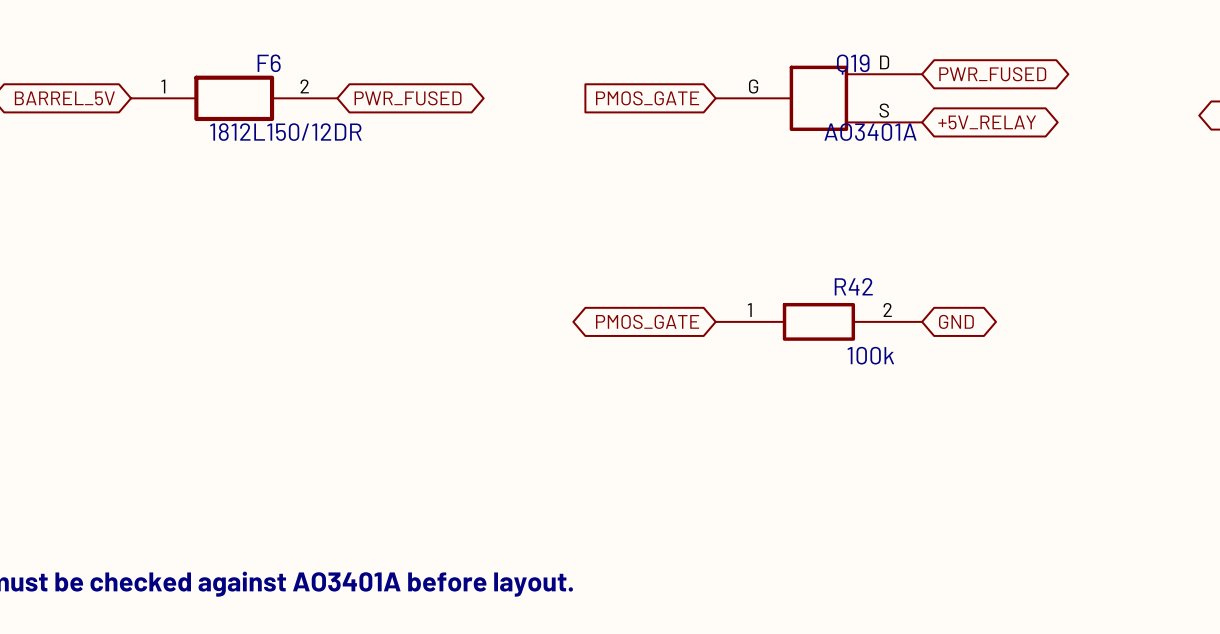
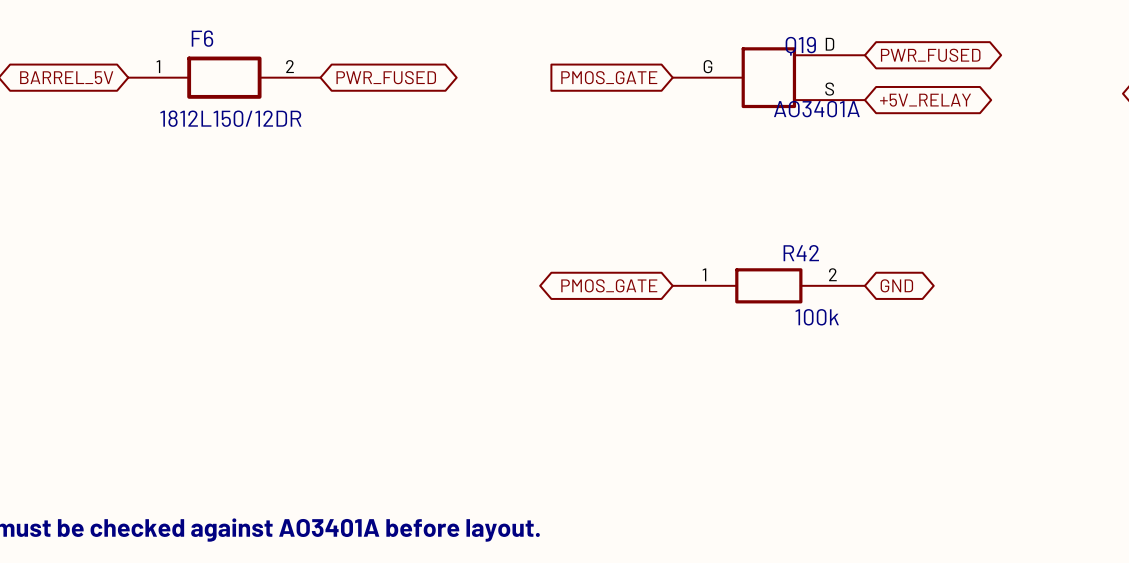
F6 name position: F6 (269, 63) -> F6 (202, 38)
F6 value position: 1812L150/12DR (285, 132) -> 1812L150/12DR (230, 118)

